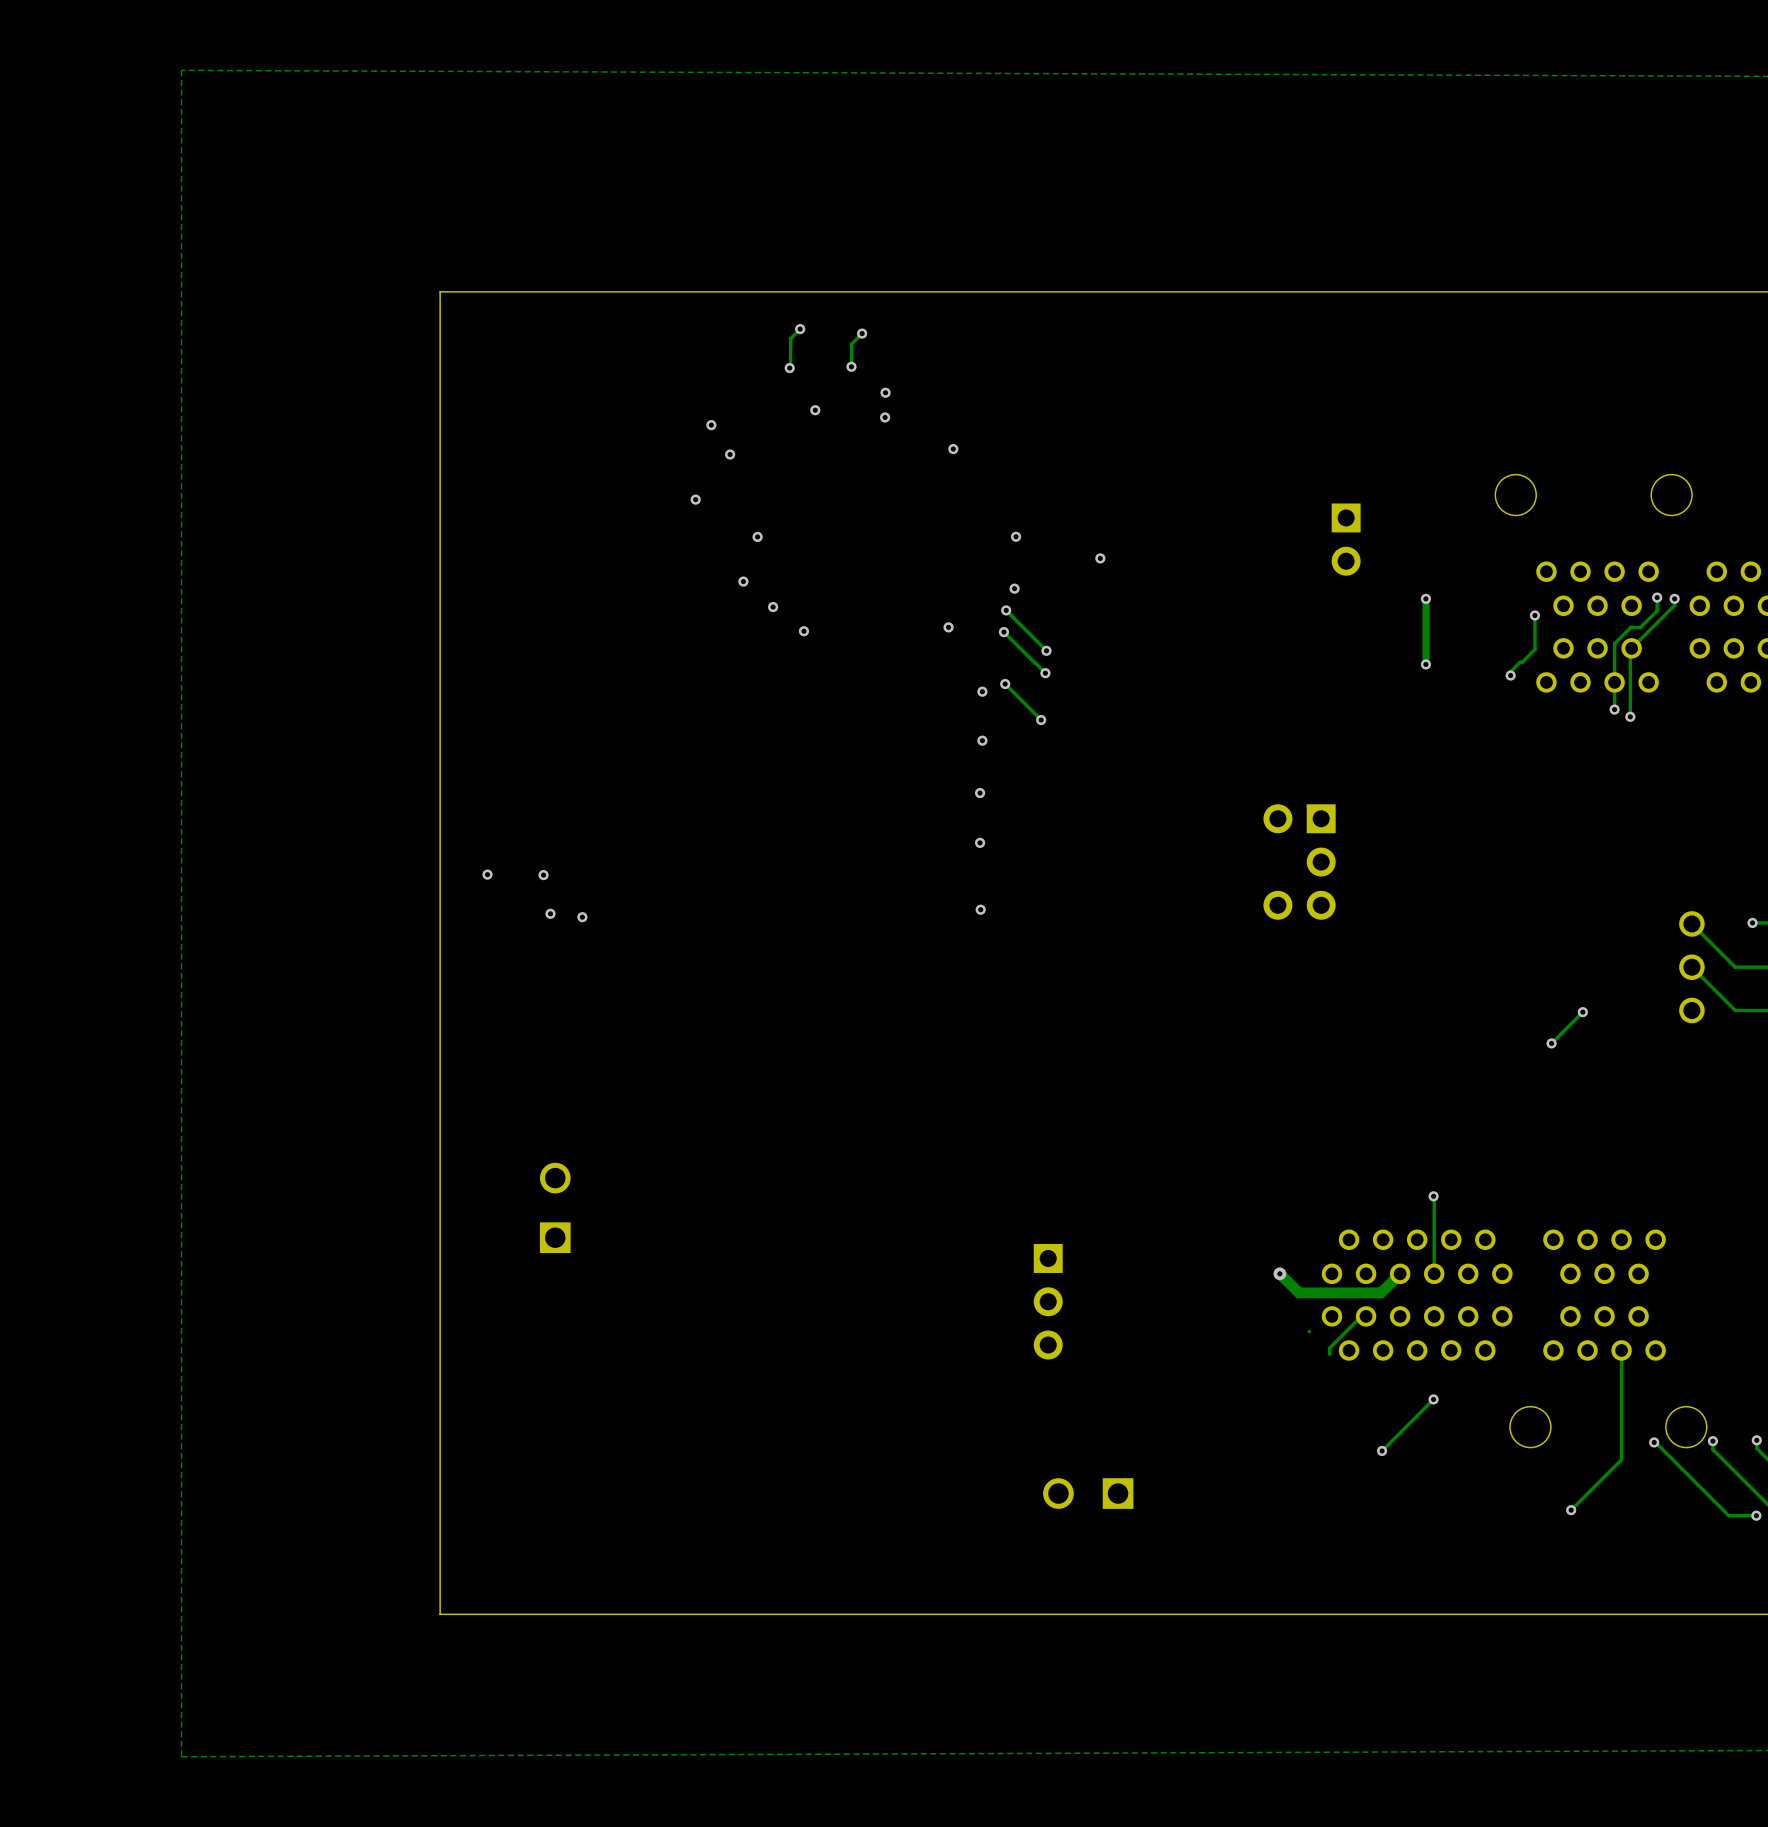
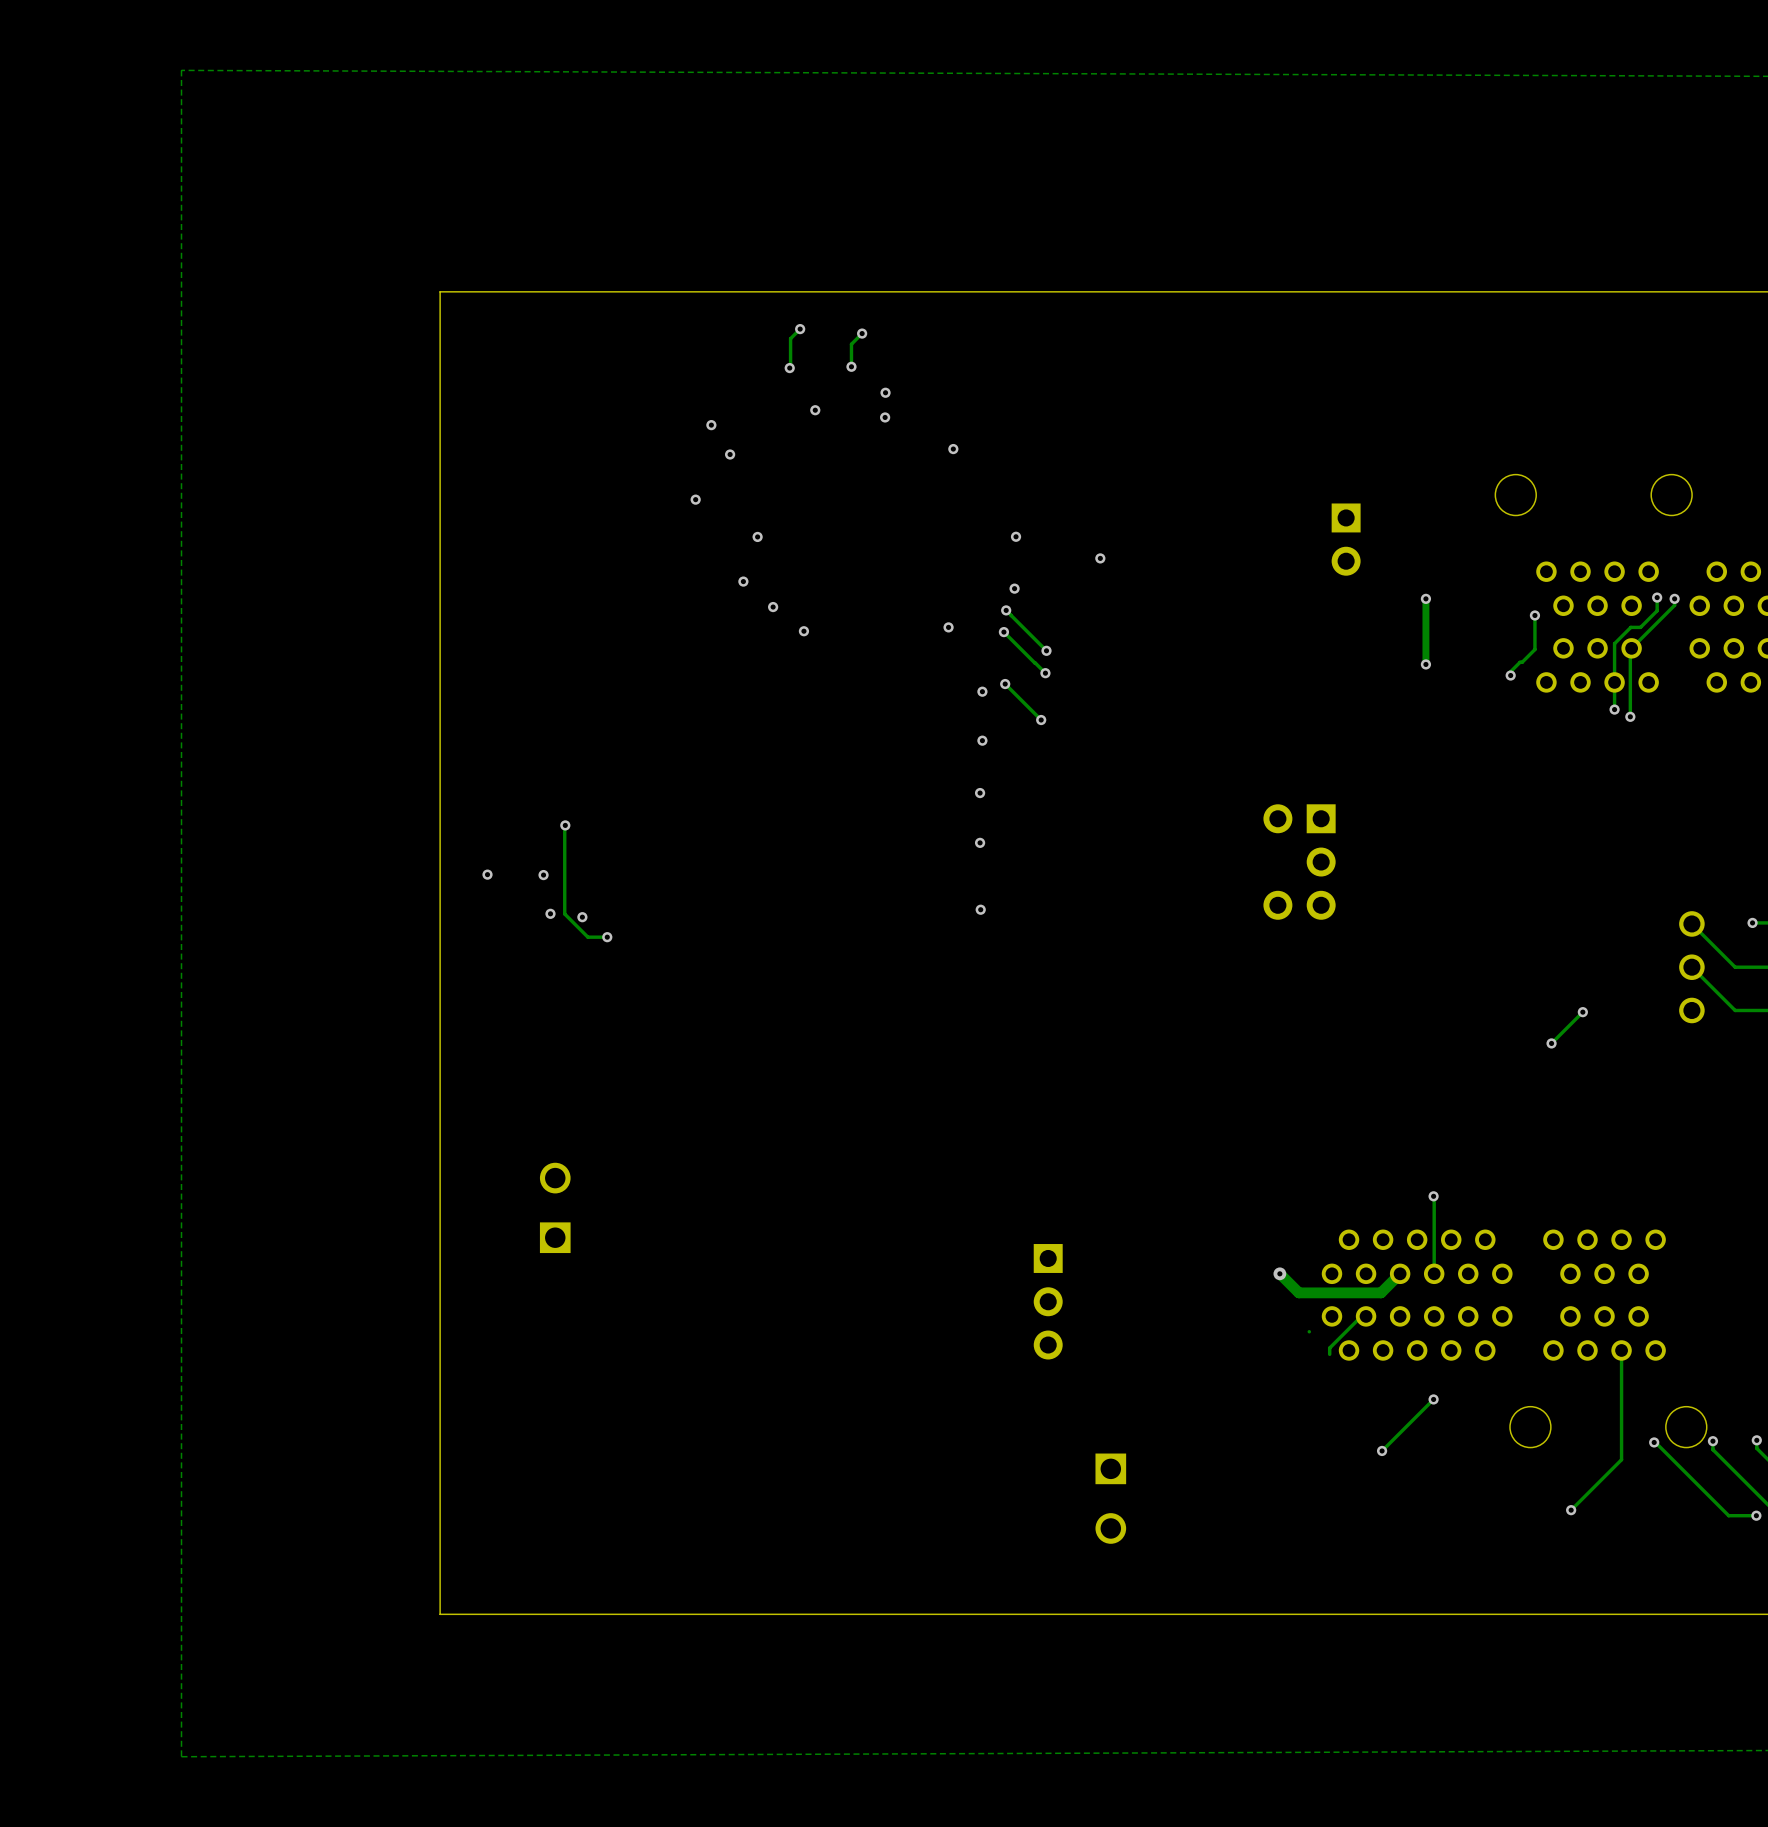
track: none -> (565, 825) (564, 914) (587, 937) (607, 937)
via: none -> (565, 825)
via: none -> (607, 937)
part rotation: 0° (1088, 1493) -> 90° counterclockwise (1110, 1498)

